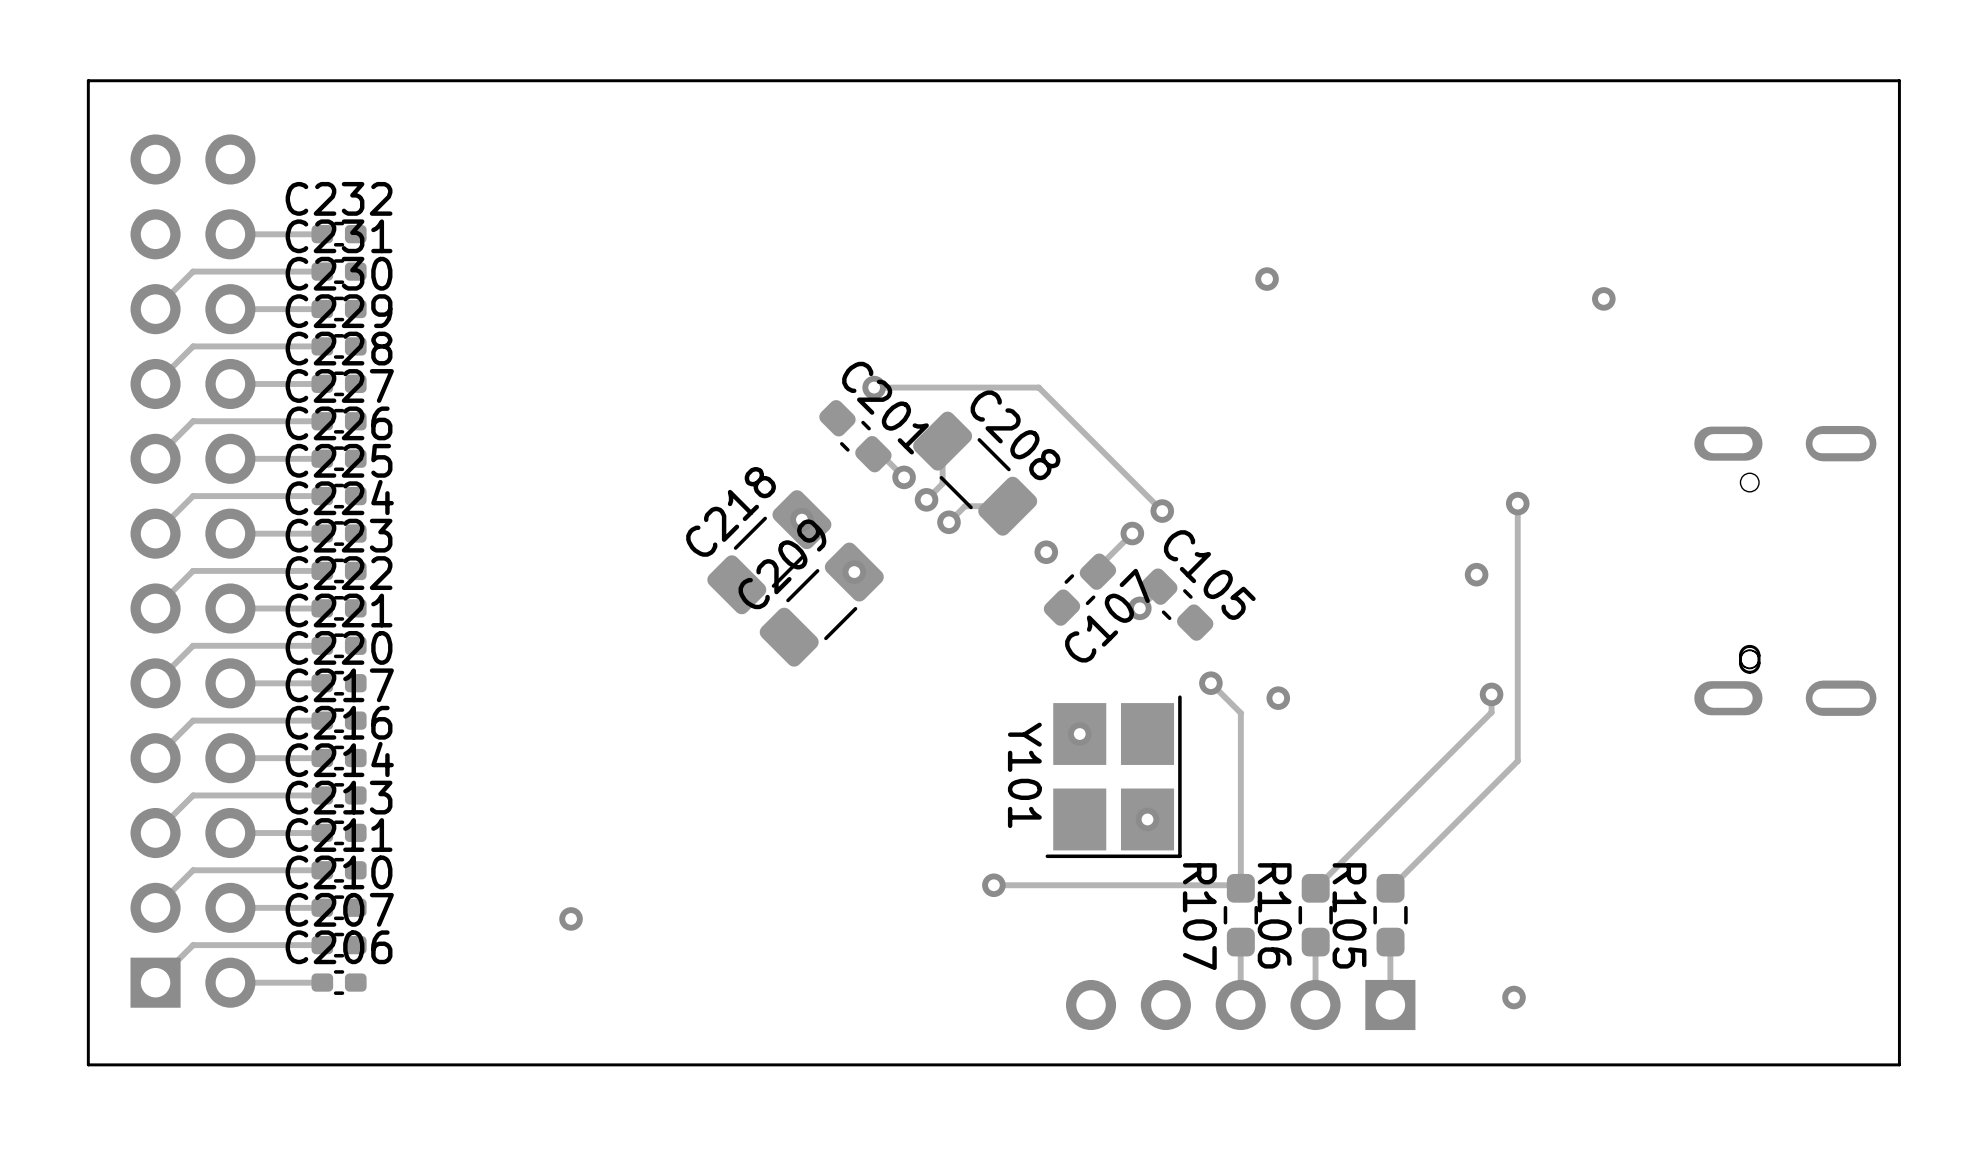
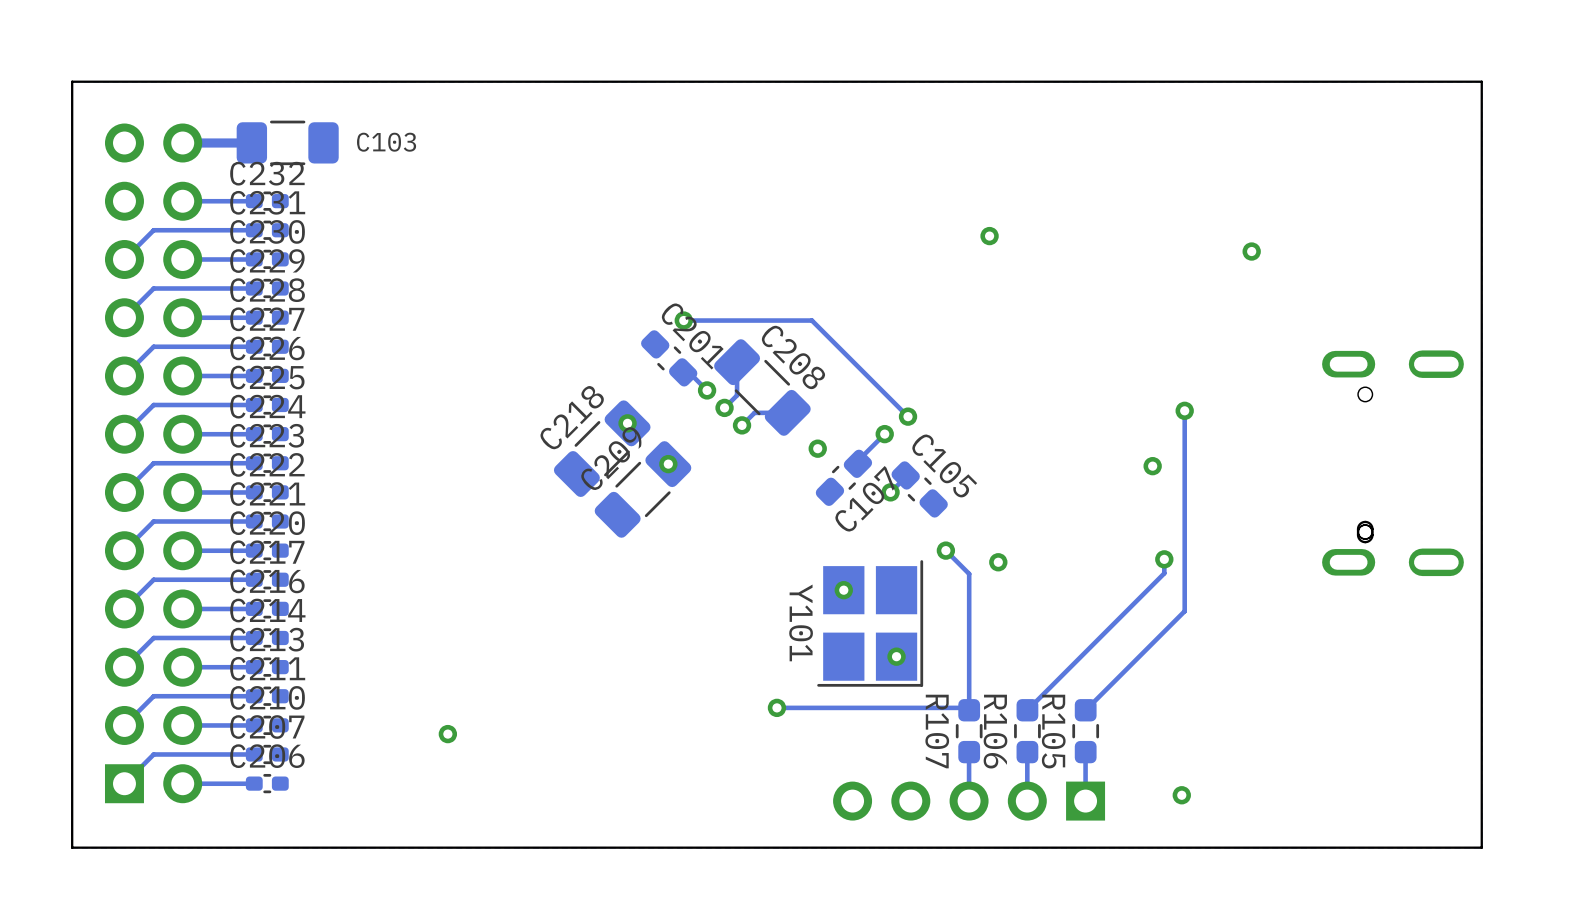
track: none -> (251, 143) (182, 143)
C103: none -> (287, 142)

